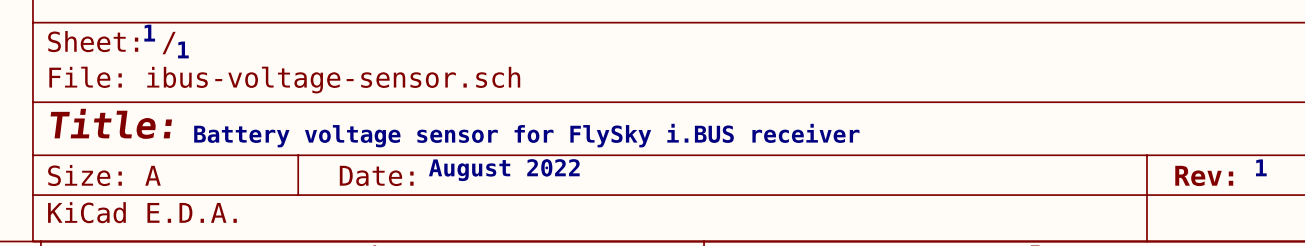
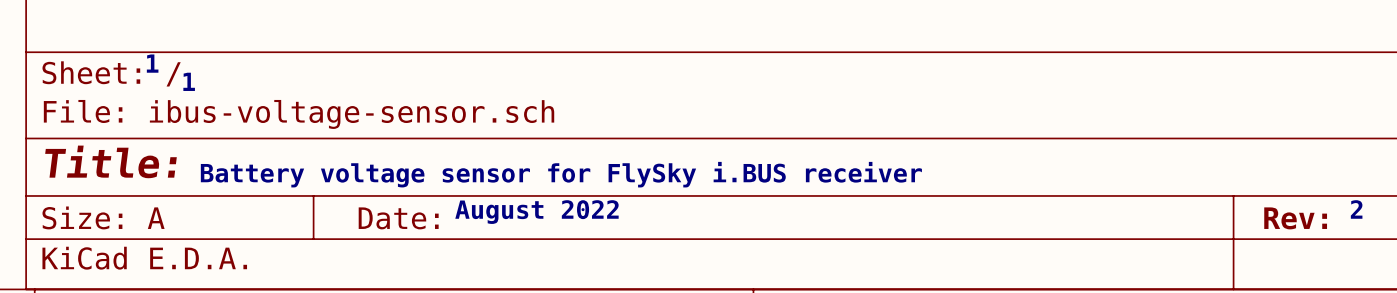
text: 1 (1261, 167) -> 2 (1356, 209)

